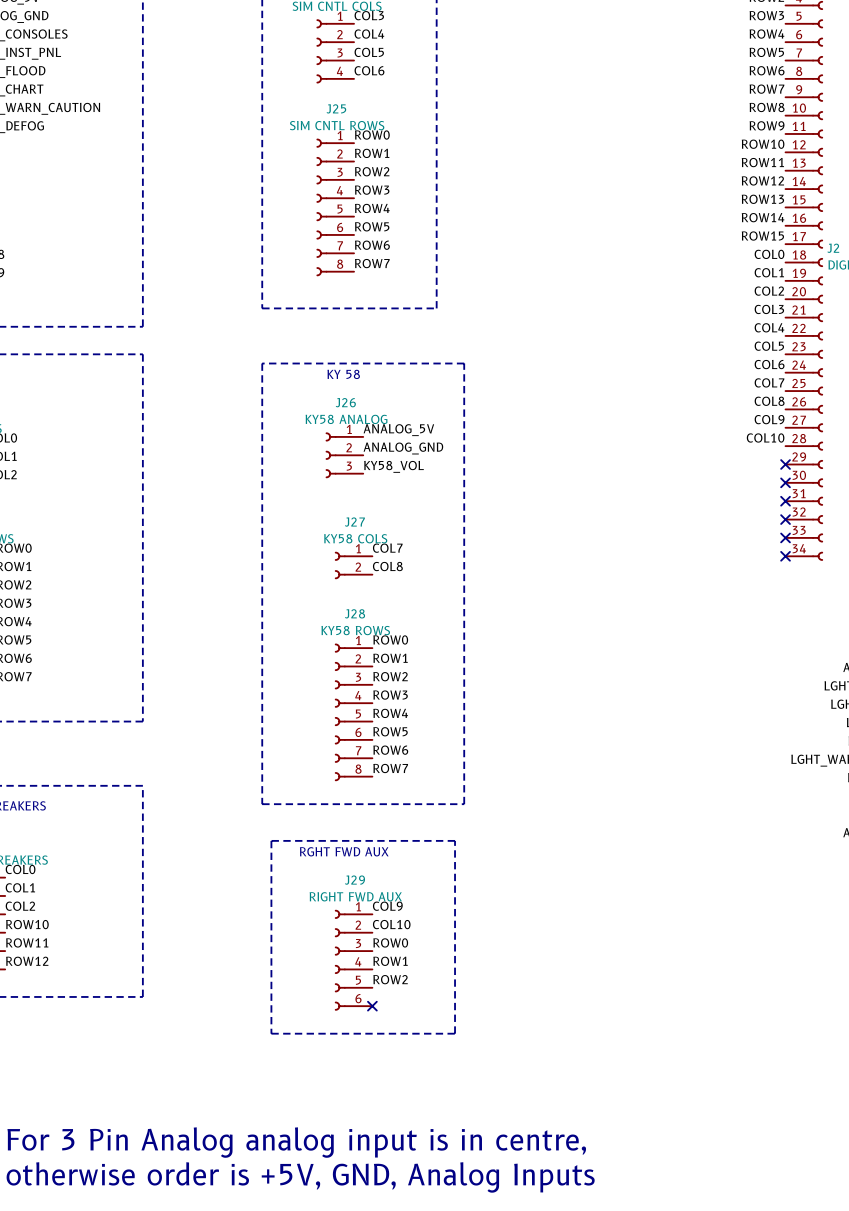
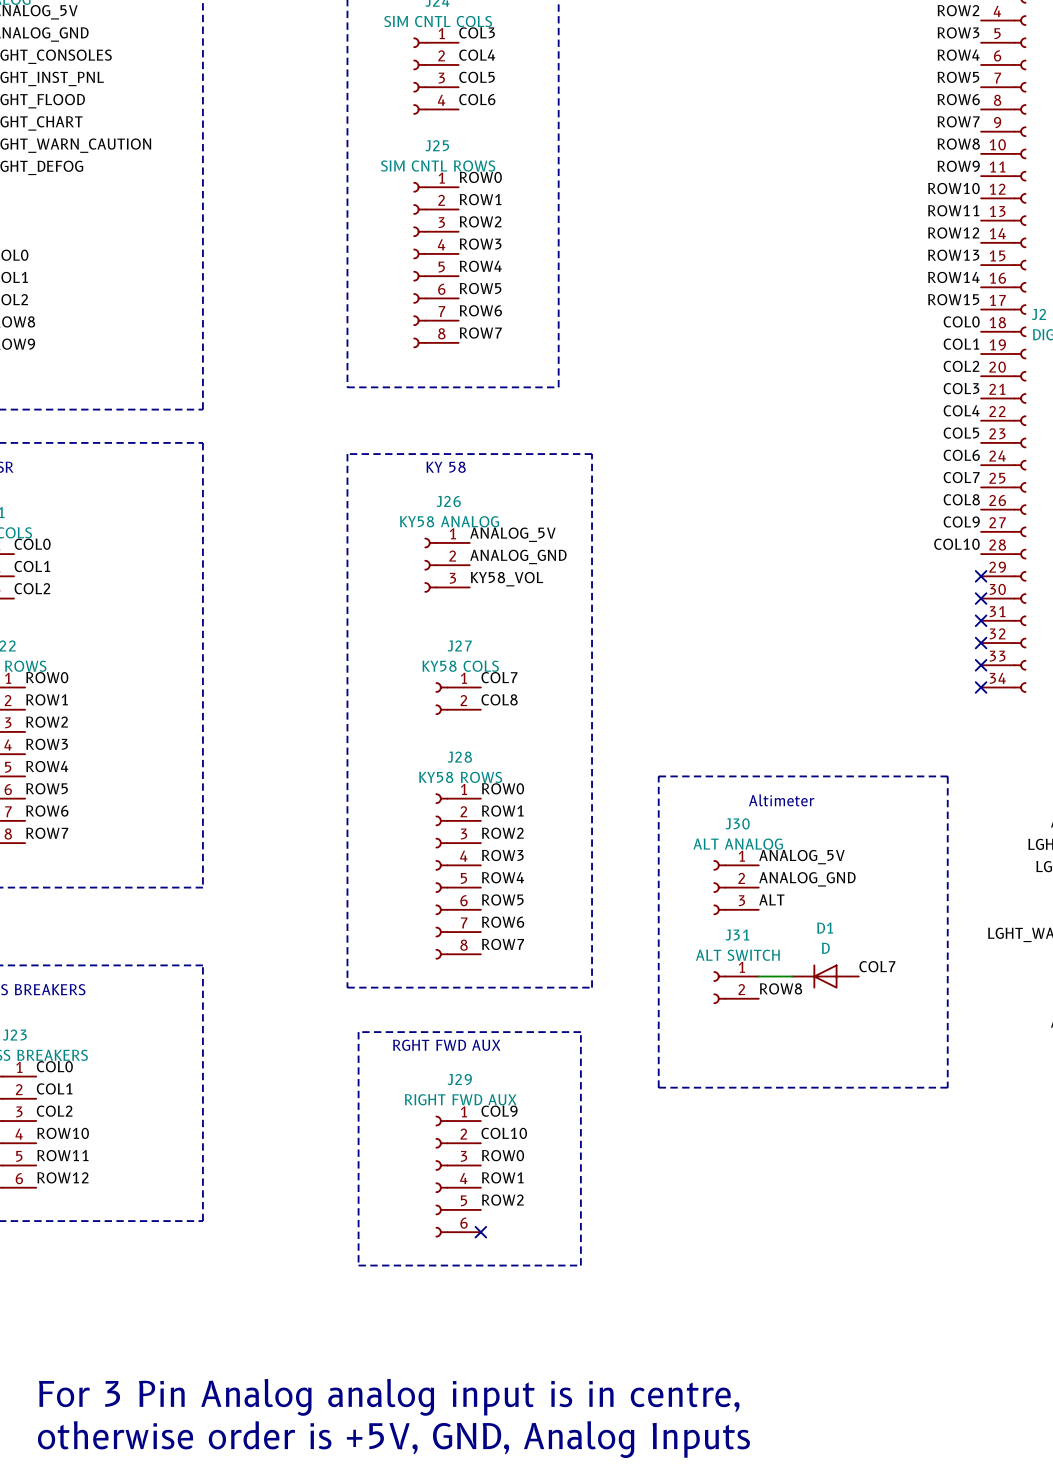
line: none -> (658, 776) (947, 776) (947, 1087) (658, 1087) (658, 776)
text: none -> Altimeter (781, 800)
label: none -> ANALOG_5V (801, 857)
label: none -> ANALOG_GND (807, 879)
J30: none -> ALT ANALOG (736, 887)
label: none -> ALT (771, 899)
label: none -> COL7 (877, 966)
wire: none -> (758, 976) (792, 976)
D1: none -> D (825, 976)
J31: none -> ALT SWITCH (736, 987)
label: none -> ROW8 (781, 988)

